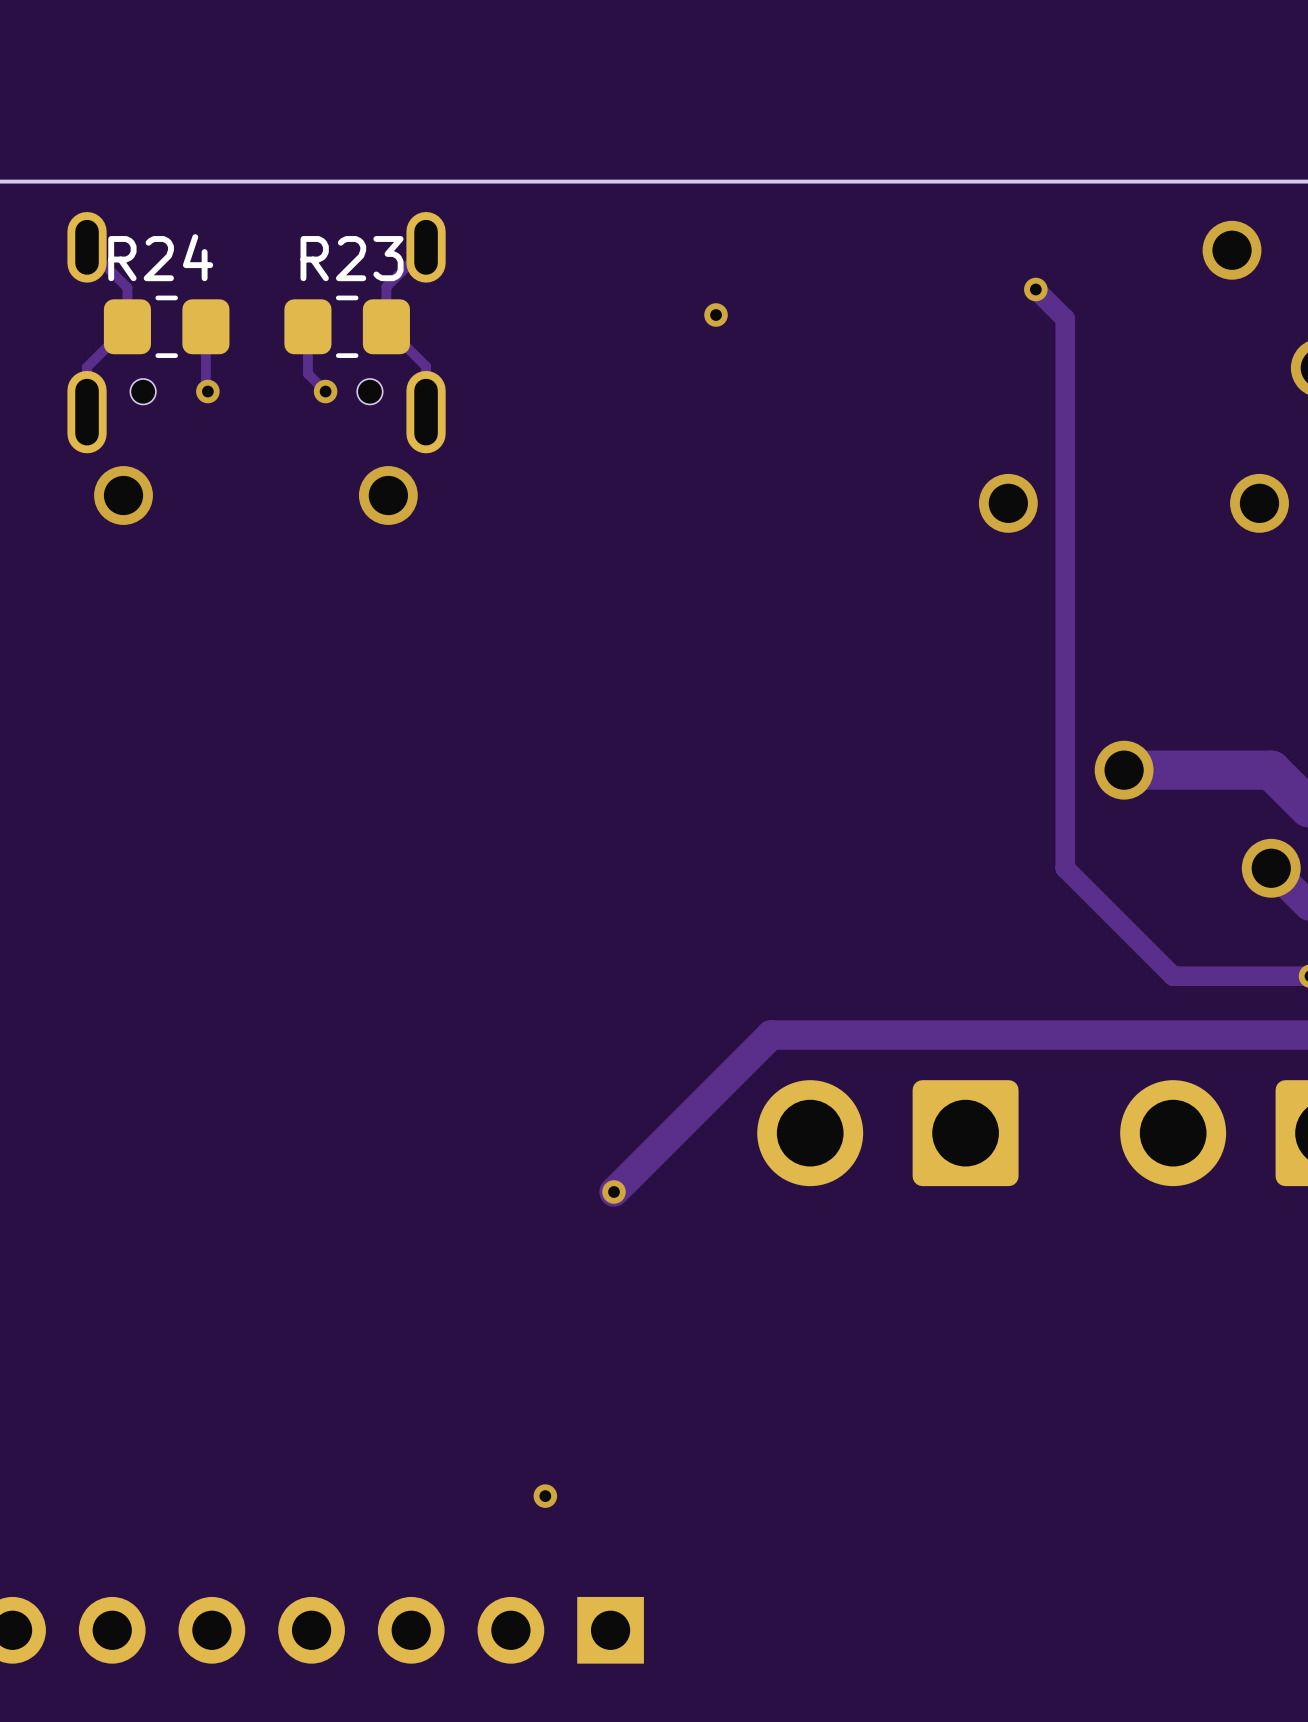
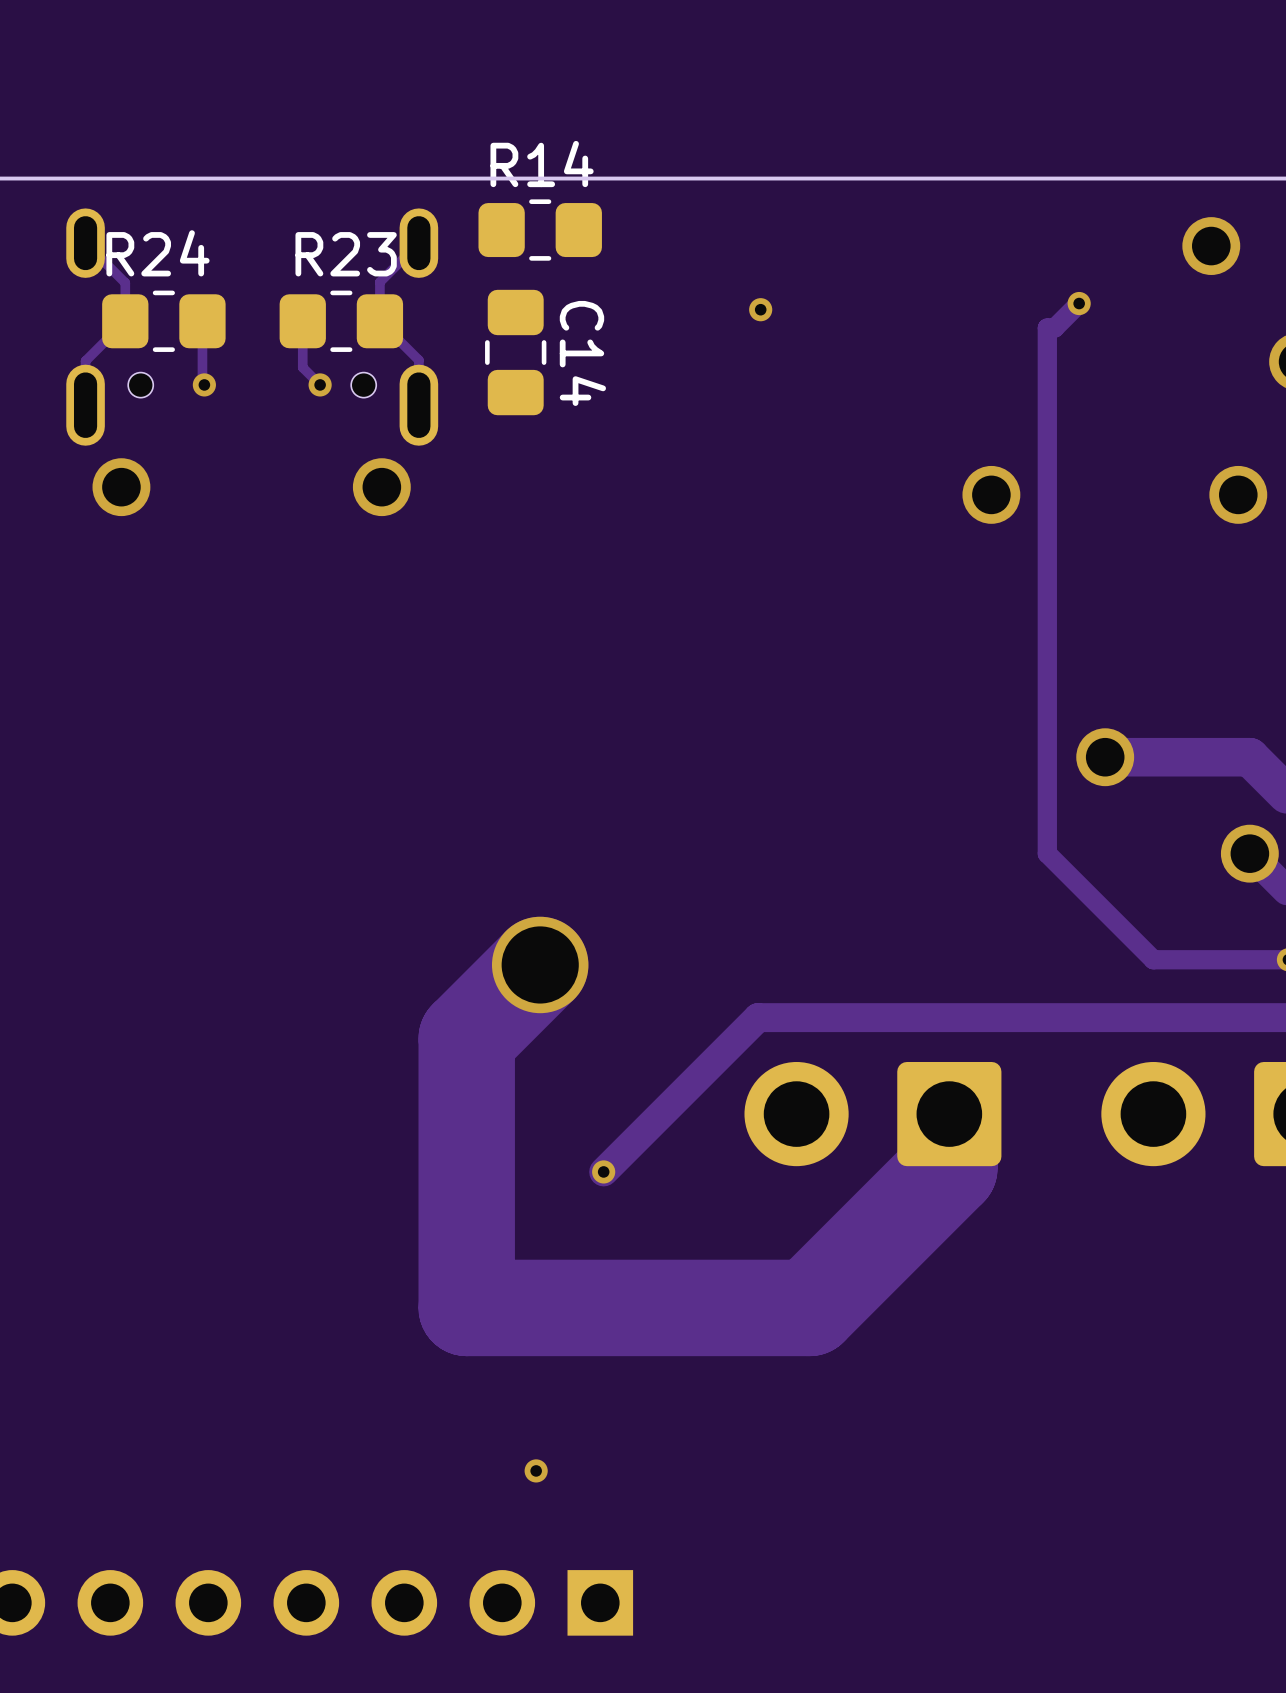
R14: none -> (540, 230)
track: (1035, 289) (1065, 318) (1065, 333) -> (1079, 303) (1054, 328) (1047, 328)
via position: (1035, 289) -> (1079, 303)
via position: (716, 315) -> (760, 309)
C14: none -> (515, 352)
track: none -> (540, 964) (466, 1038) (466, 1307) (809, 1307) (949, 1168) (949, 1114)
via: none -> (540, 964)

